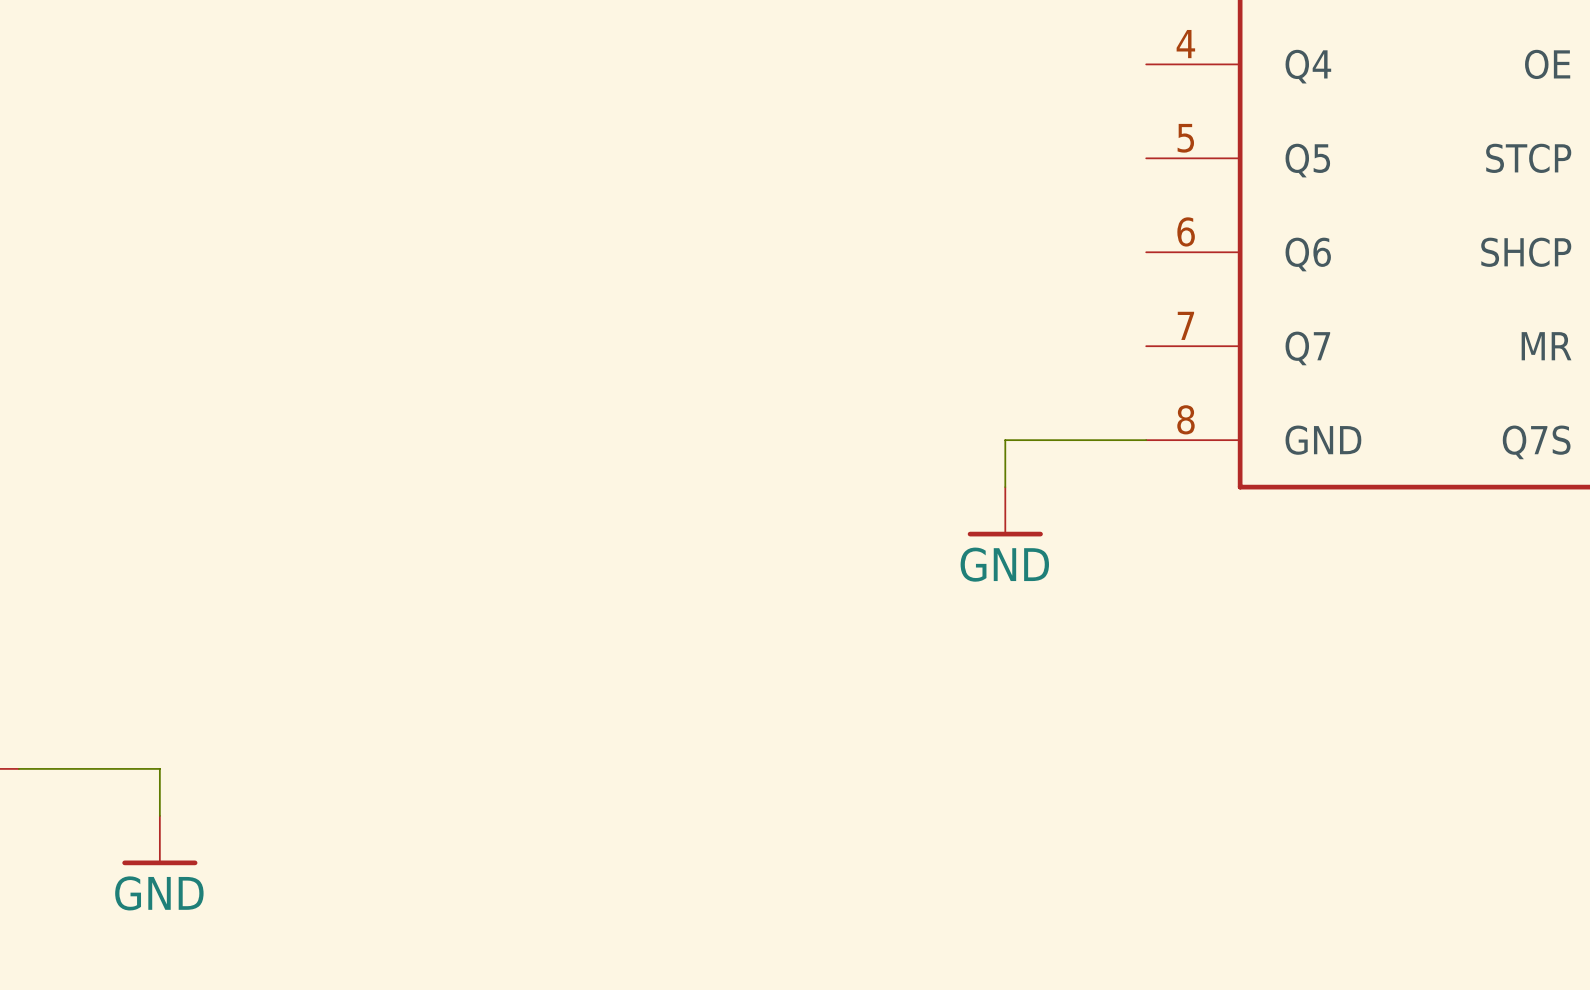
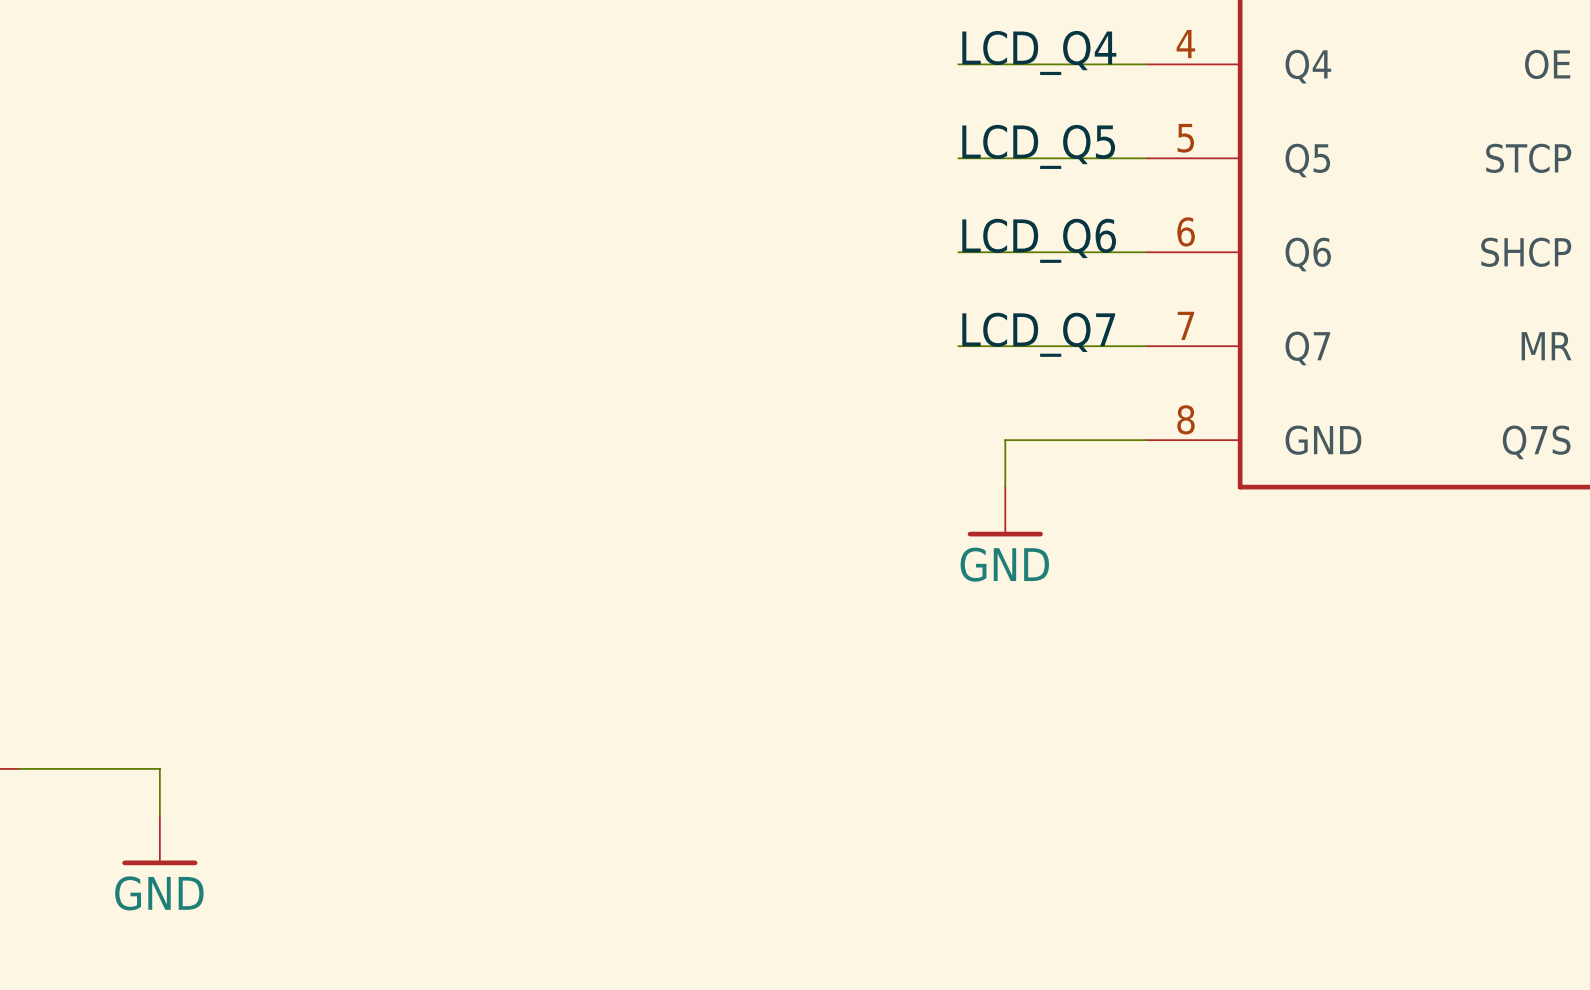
label: none -> LCD_Q4 (1039, 52)
wire: none -> (958, 64) (1146, 64)
label: none -> LCD_Q5 (1038, 146)
wire: none -> (958, 158) (1146, 158)
label: none -> LCD_Q6 (1039, 240)
wire: none -> (958, 252) (1146, 252)
label: none -> LCD_Q7 (1038, 334)
wire: none -> (958, 346) (1146, 346)

